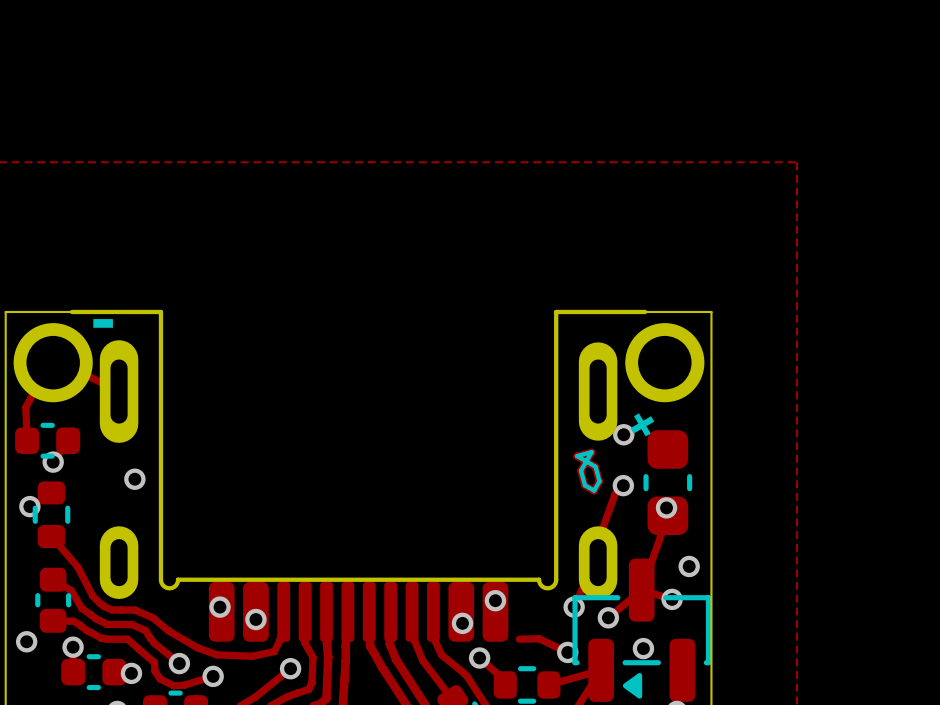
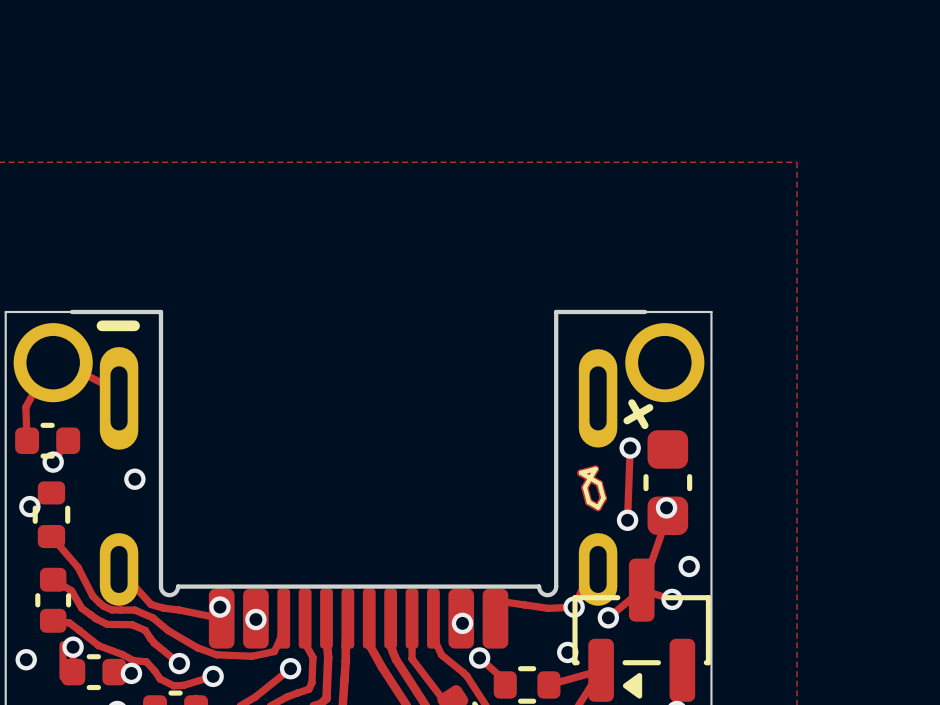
part footprint: [69, 309, 648, 642] -> [69, 309, 648, 649]
via position: (623, 434) -> (630, 448)
track: none -> (630, 448) (627, 520)
line: (591, 452) (577, 456) (595, 466) (599, 481) (594, 490) (584, 485) (580, 470) (591, 452) -> (595, 468) (581, 472) (599, 483) (603, 498) (598, 507) (588, 502) (584, 487) (595, 468)
track: (591, 452) (580, 470) (584, 485) (594, 490) (599, 481) (595, 466) (576, 456) (591, 452) -> (595, 469) (584, 487) (588, 502) (597, 507) (603, 498) (599, 483) (580, 473) (595, 469)
via: (623, 485) -> none
track: (615, 493) (598, 541) -> none
via: none -> (627, 520)
track: none -> (119, 569) (151, 604) (221, 618)
track: none -> (495, 600) (548, 608) (574, 607)
via: (495, 600) -> none
track: none -> (412, 618) (412, 658) (440, 696)
track: (53, 620) (73, 621) (100, 637) (127, 639) (154, 662) (154, 671) -> (48, 620) (69, 622) (98, 645) (133, 660) (146, 661) (154, 671)
track: (519, 639) (539, 638) (567, 652) -> none
track: (414, 640) (422, 660) (452, 700) -> none
via position: (26, 641) -> (26, 659)
track: none -> (63, 644) (63, 677)
via: (643, 648) -> none

